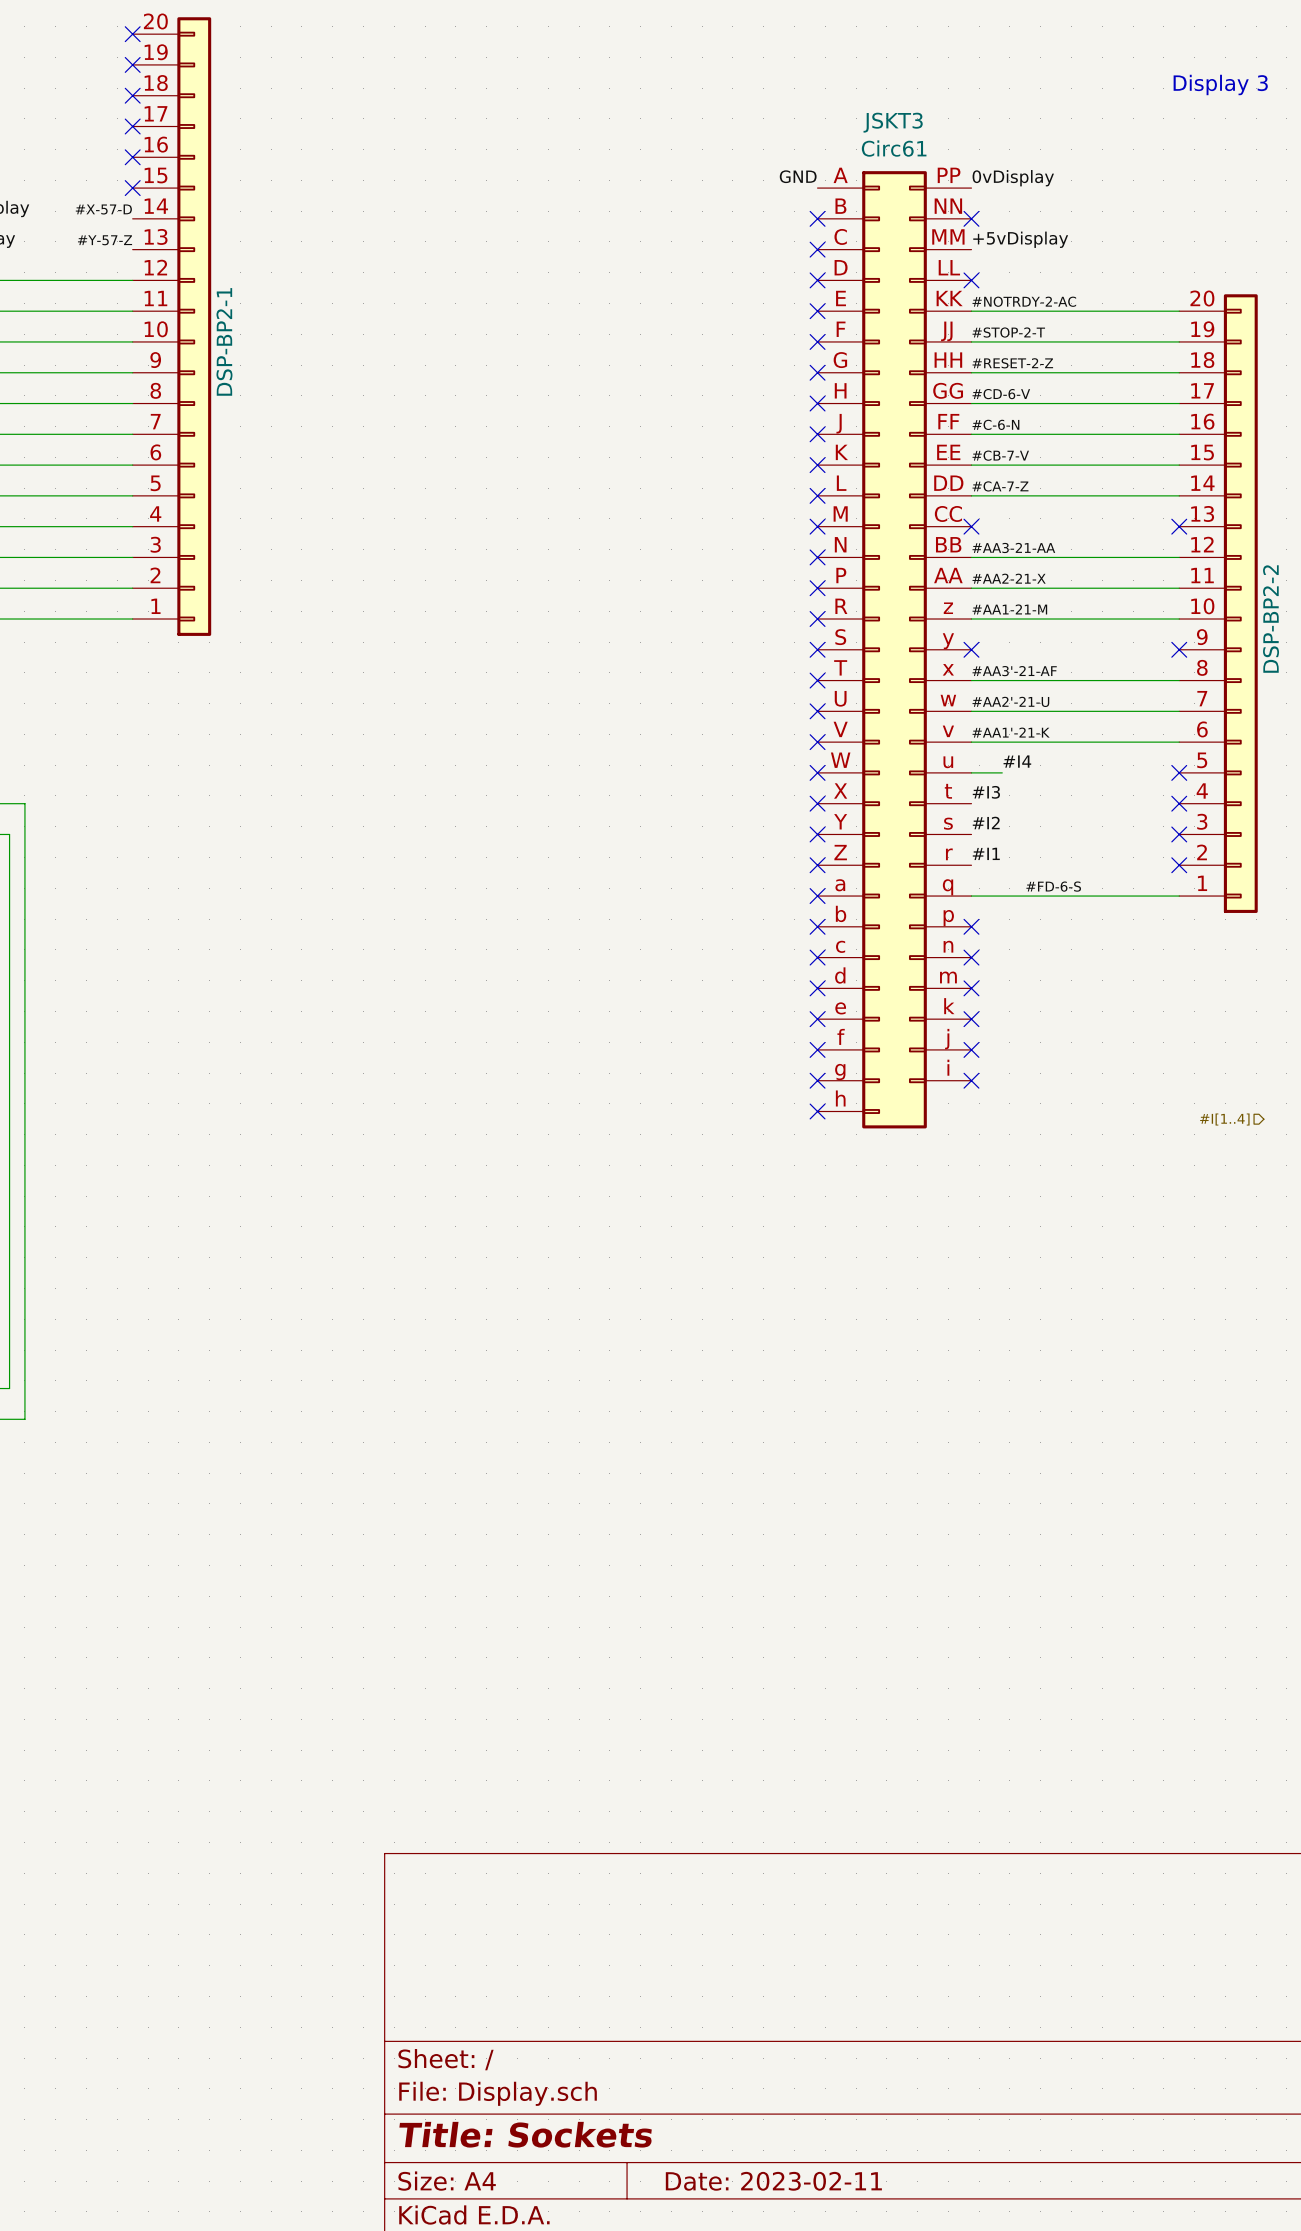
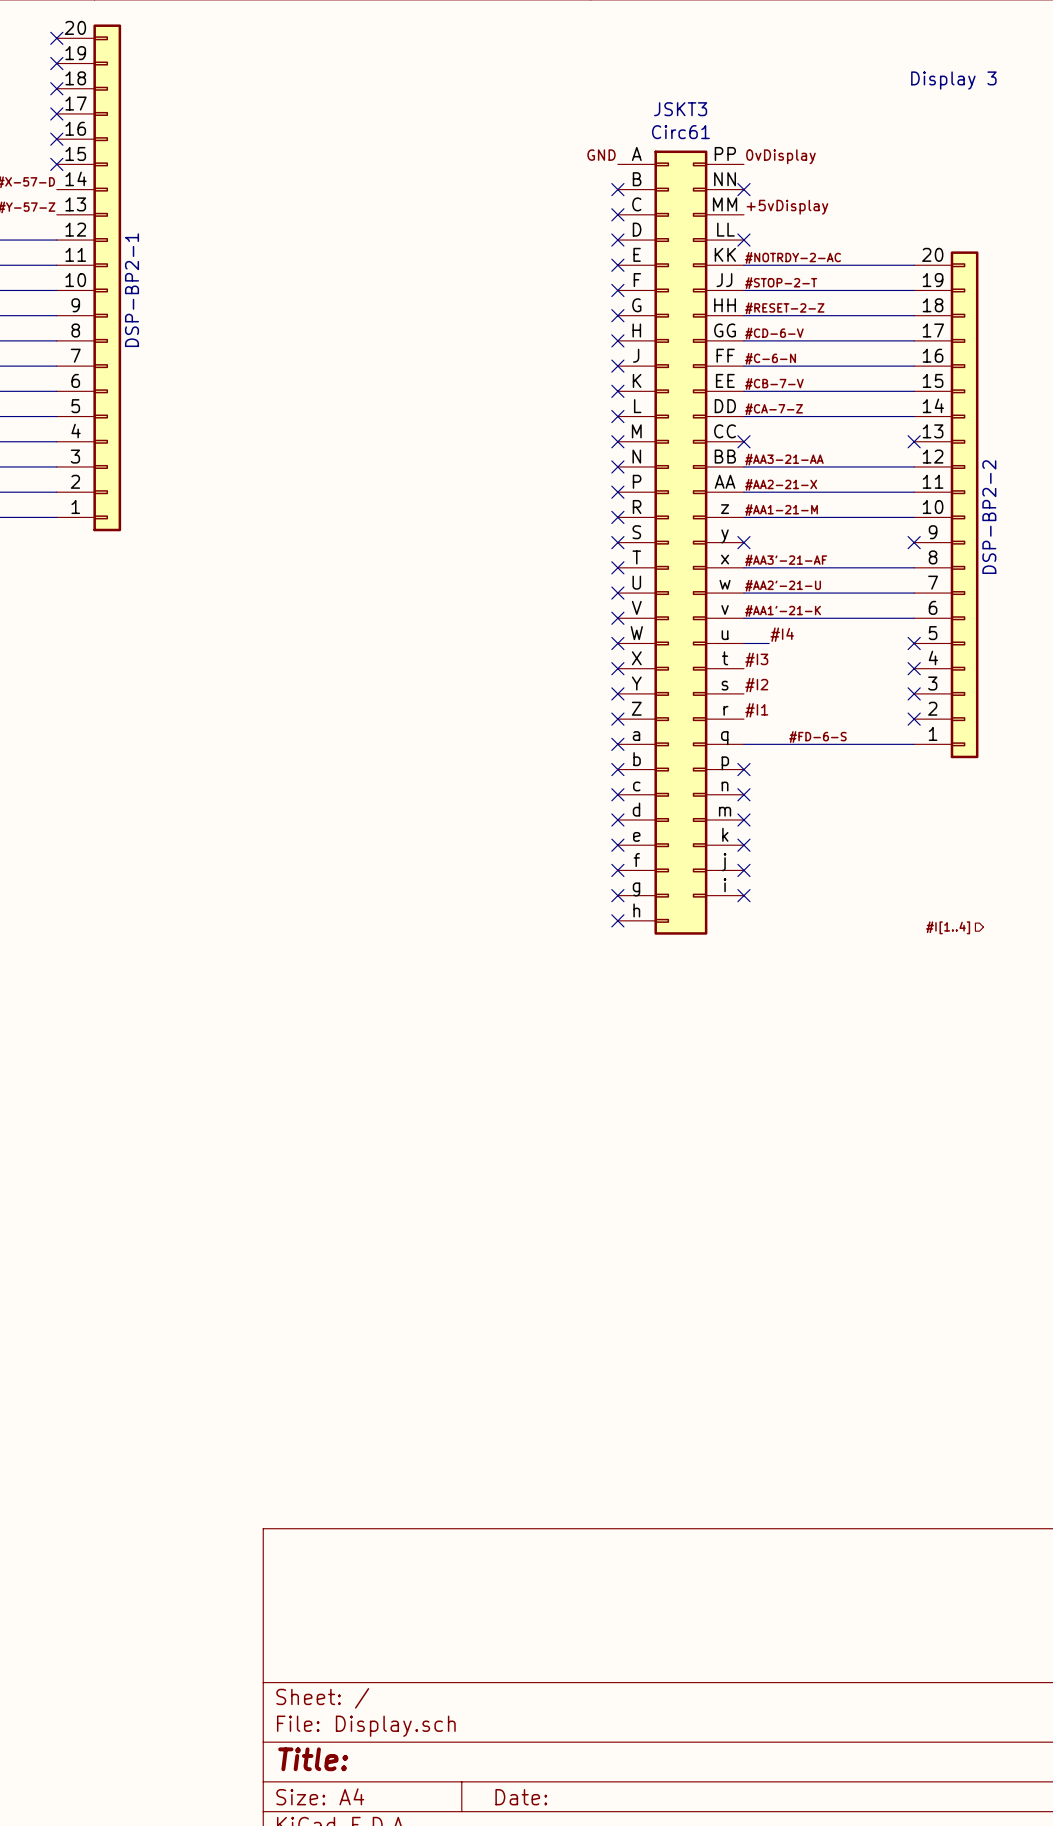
title block: Title: Sockets (525, 2134) -> Title: (313, 1759)
title block: Date: 2023-02-11 (773, 2181) -> Date: (521, 1797)

